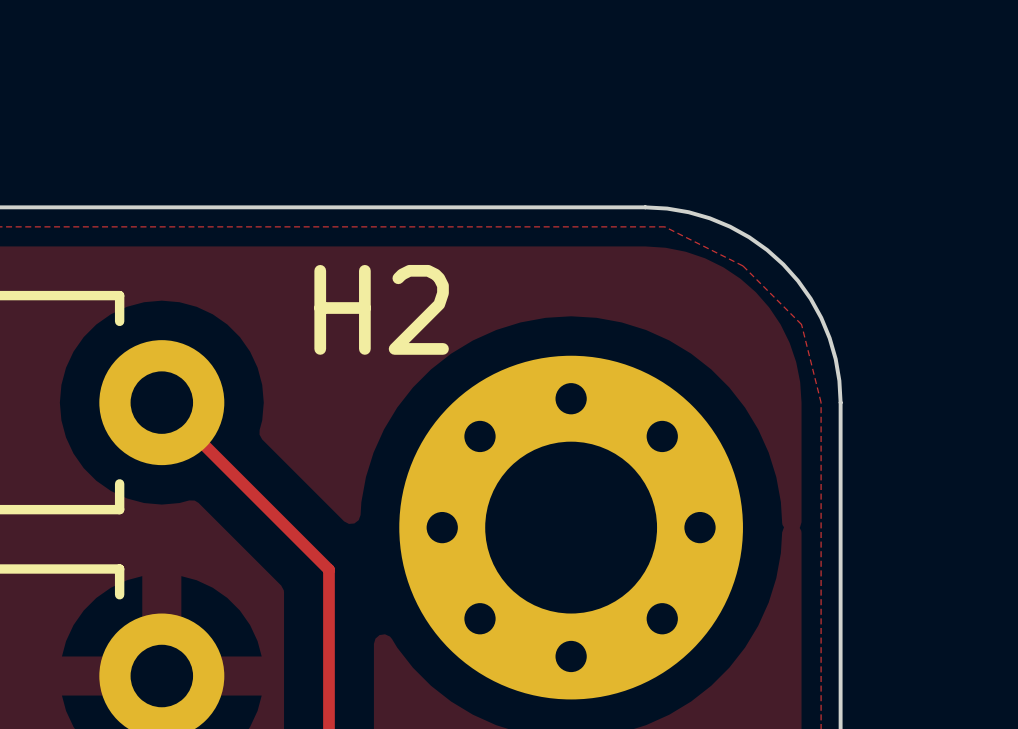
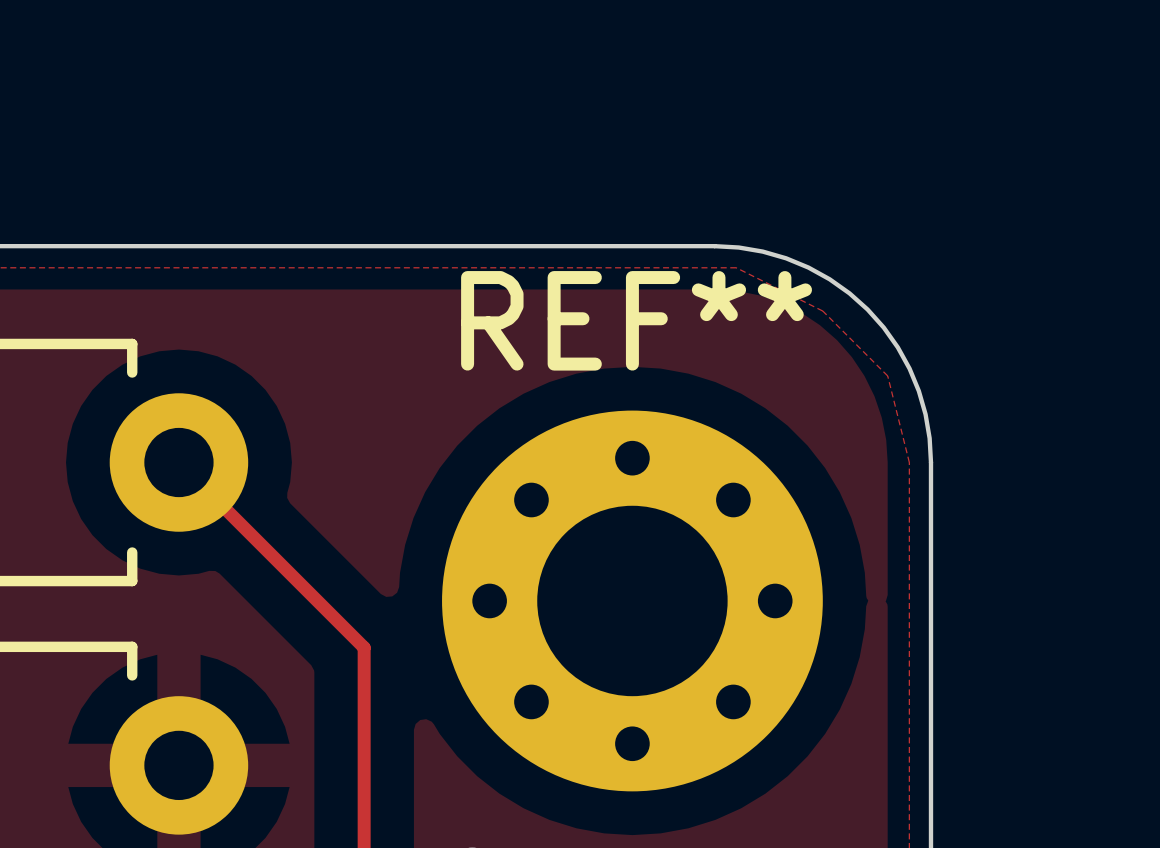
H2 name: H2 (381, 309) -> REF** (636, 320)

